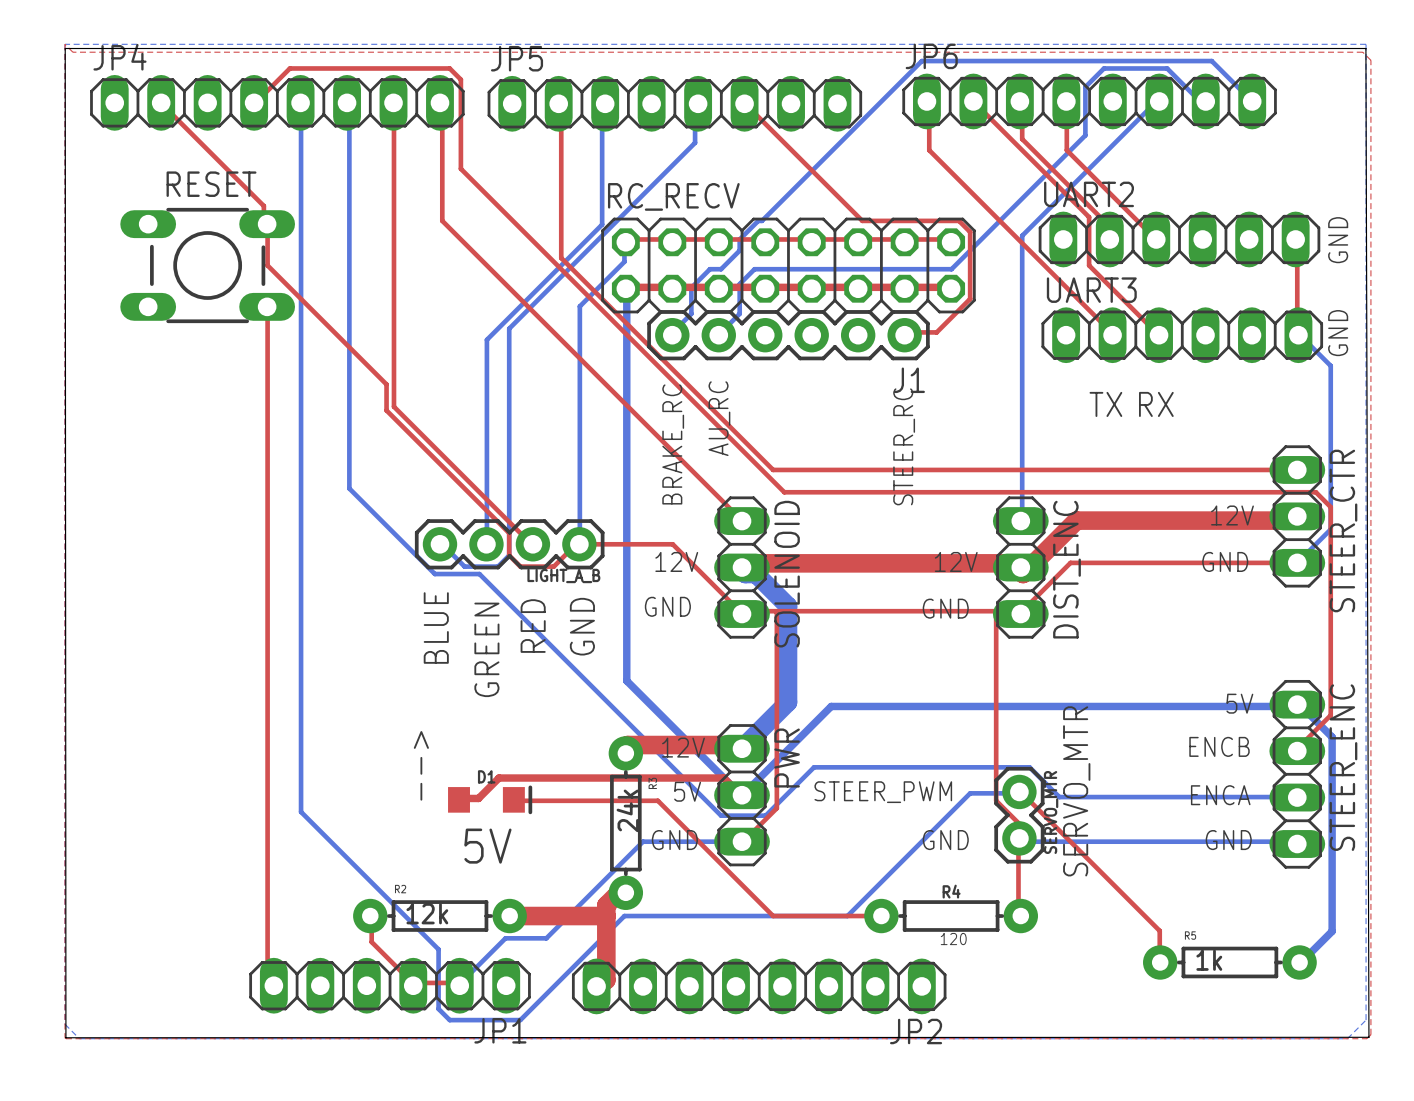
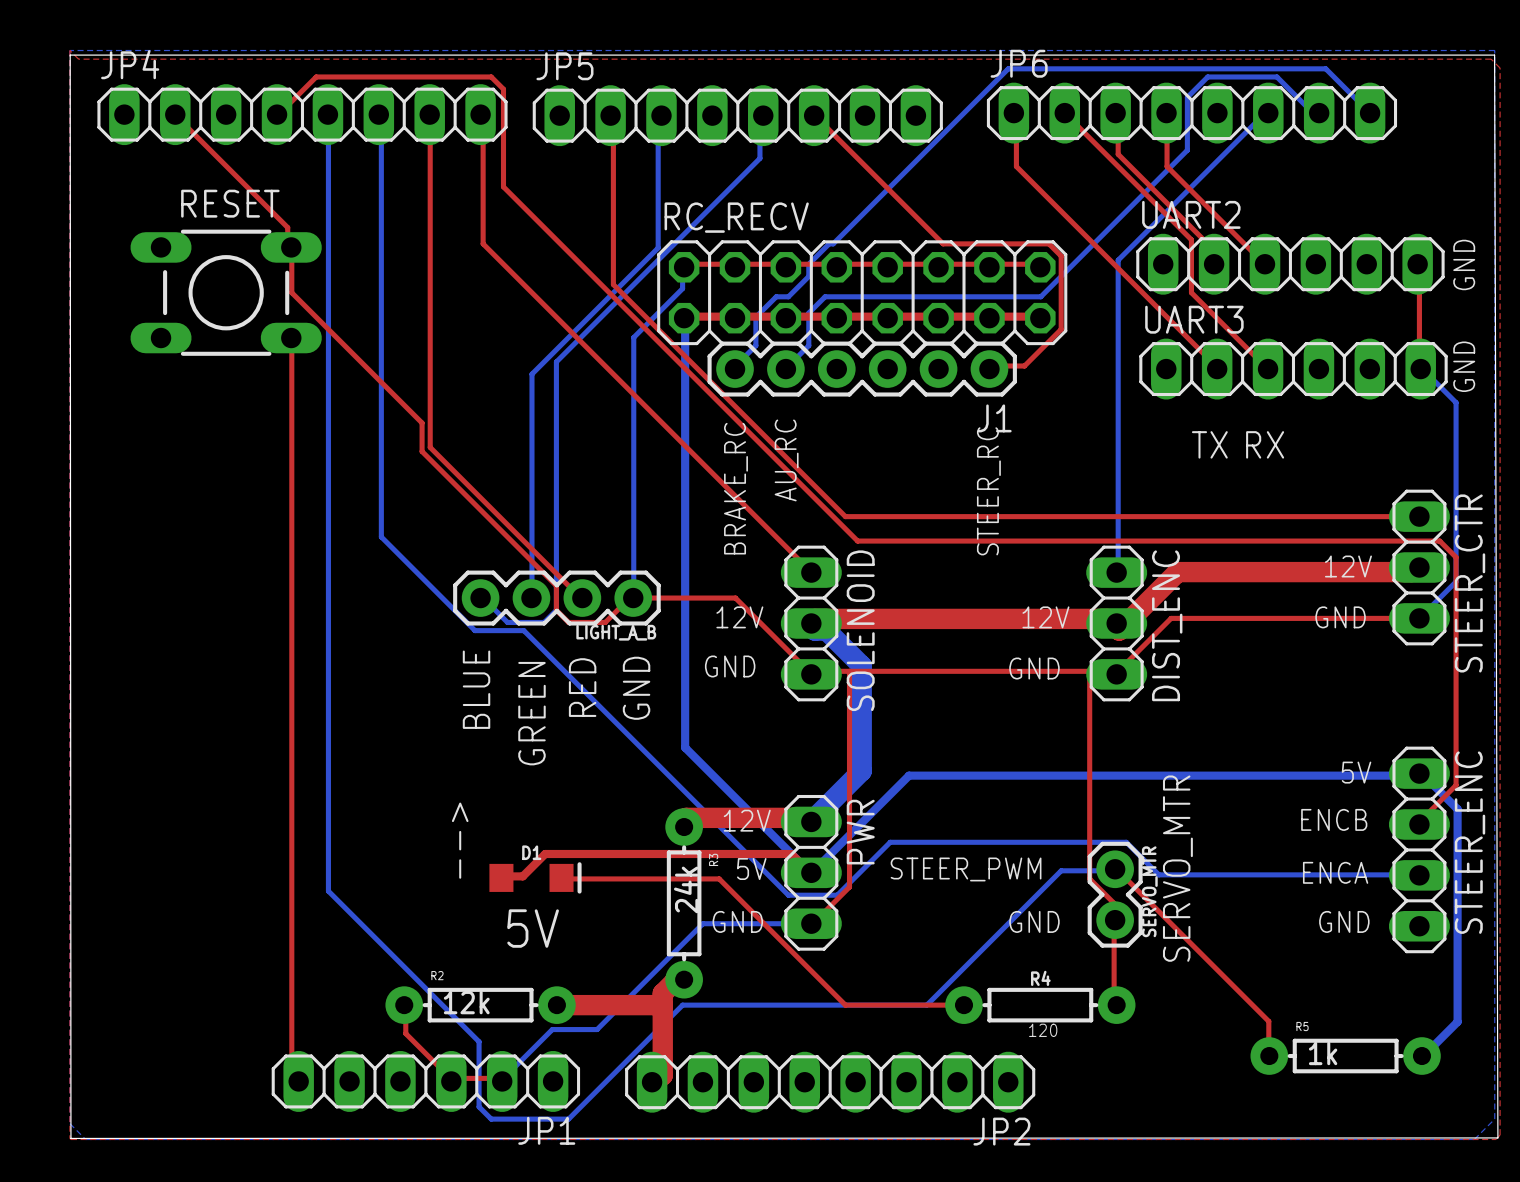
bottom track: (1019, 838) (1022, 841) (1297, 841) -> none

